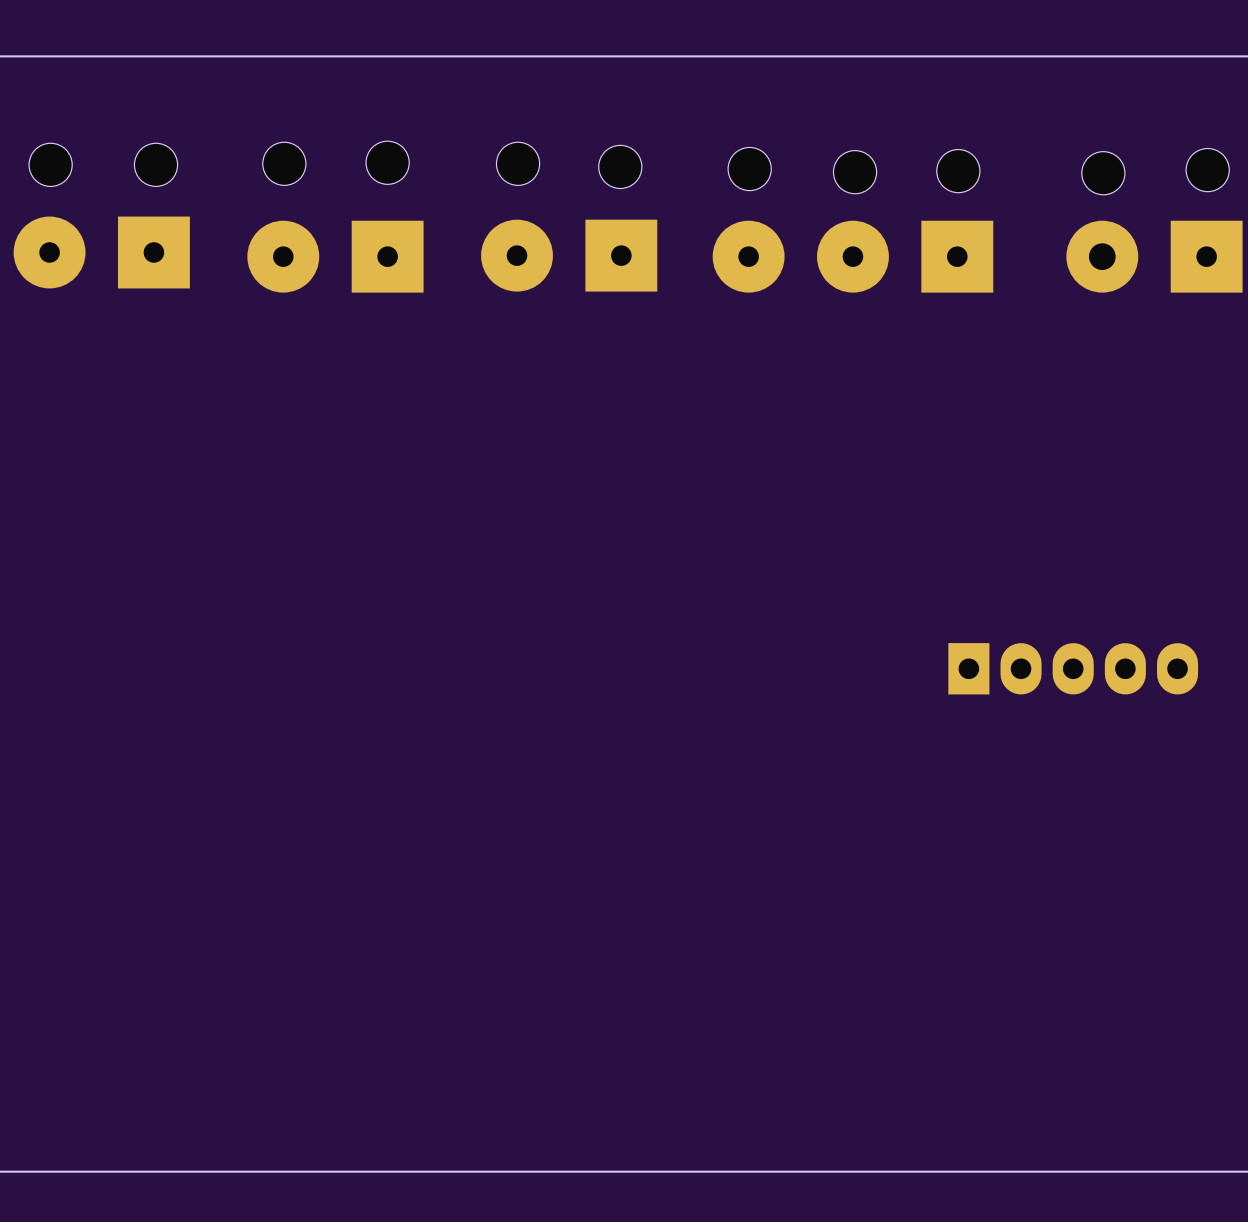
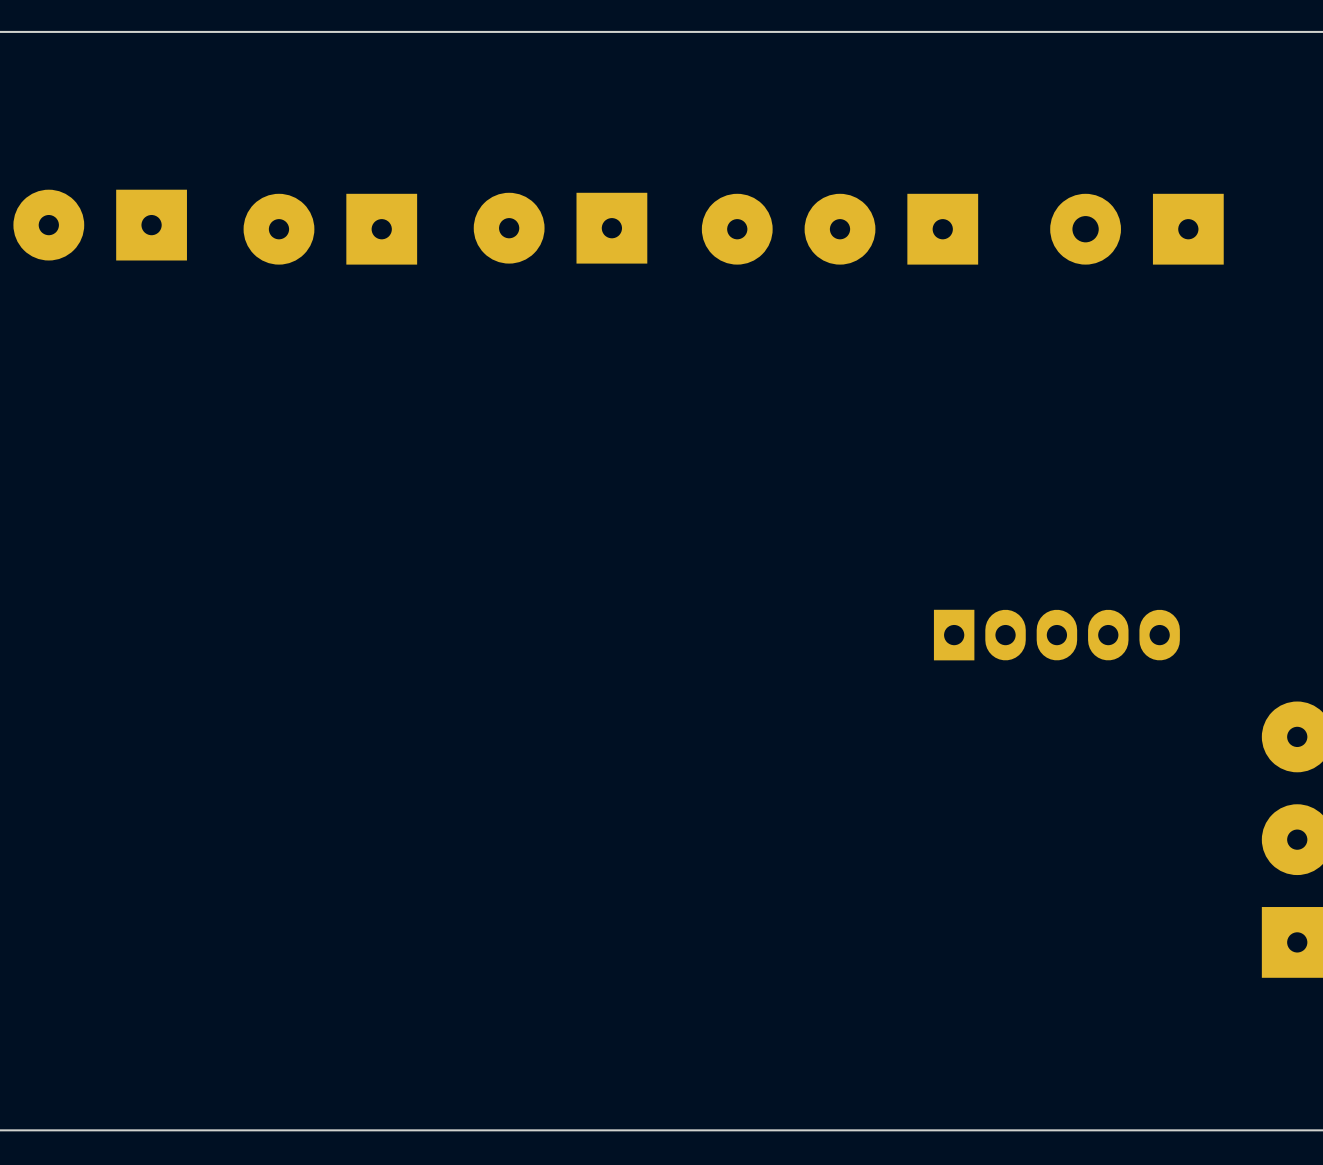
part: (387, 162) -> none
part: (284, 163) -> none
part: (518, 163) -> none
part: (50, 164) -> none
part: (156, 164) -> none
part: (620, 166) -> none
part: (749, 169) -> none
part: (1207, 170) -> none
part: (958, 171) -> none
part: (855, 172) -> none
part: (1103, 173) -> none

